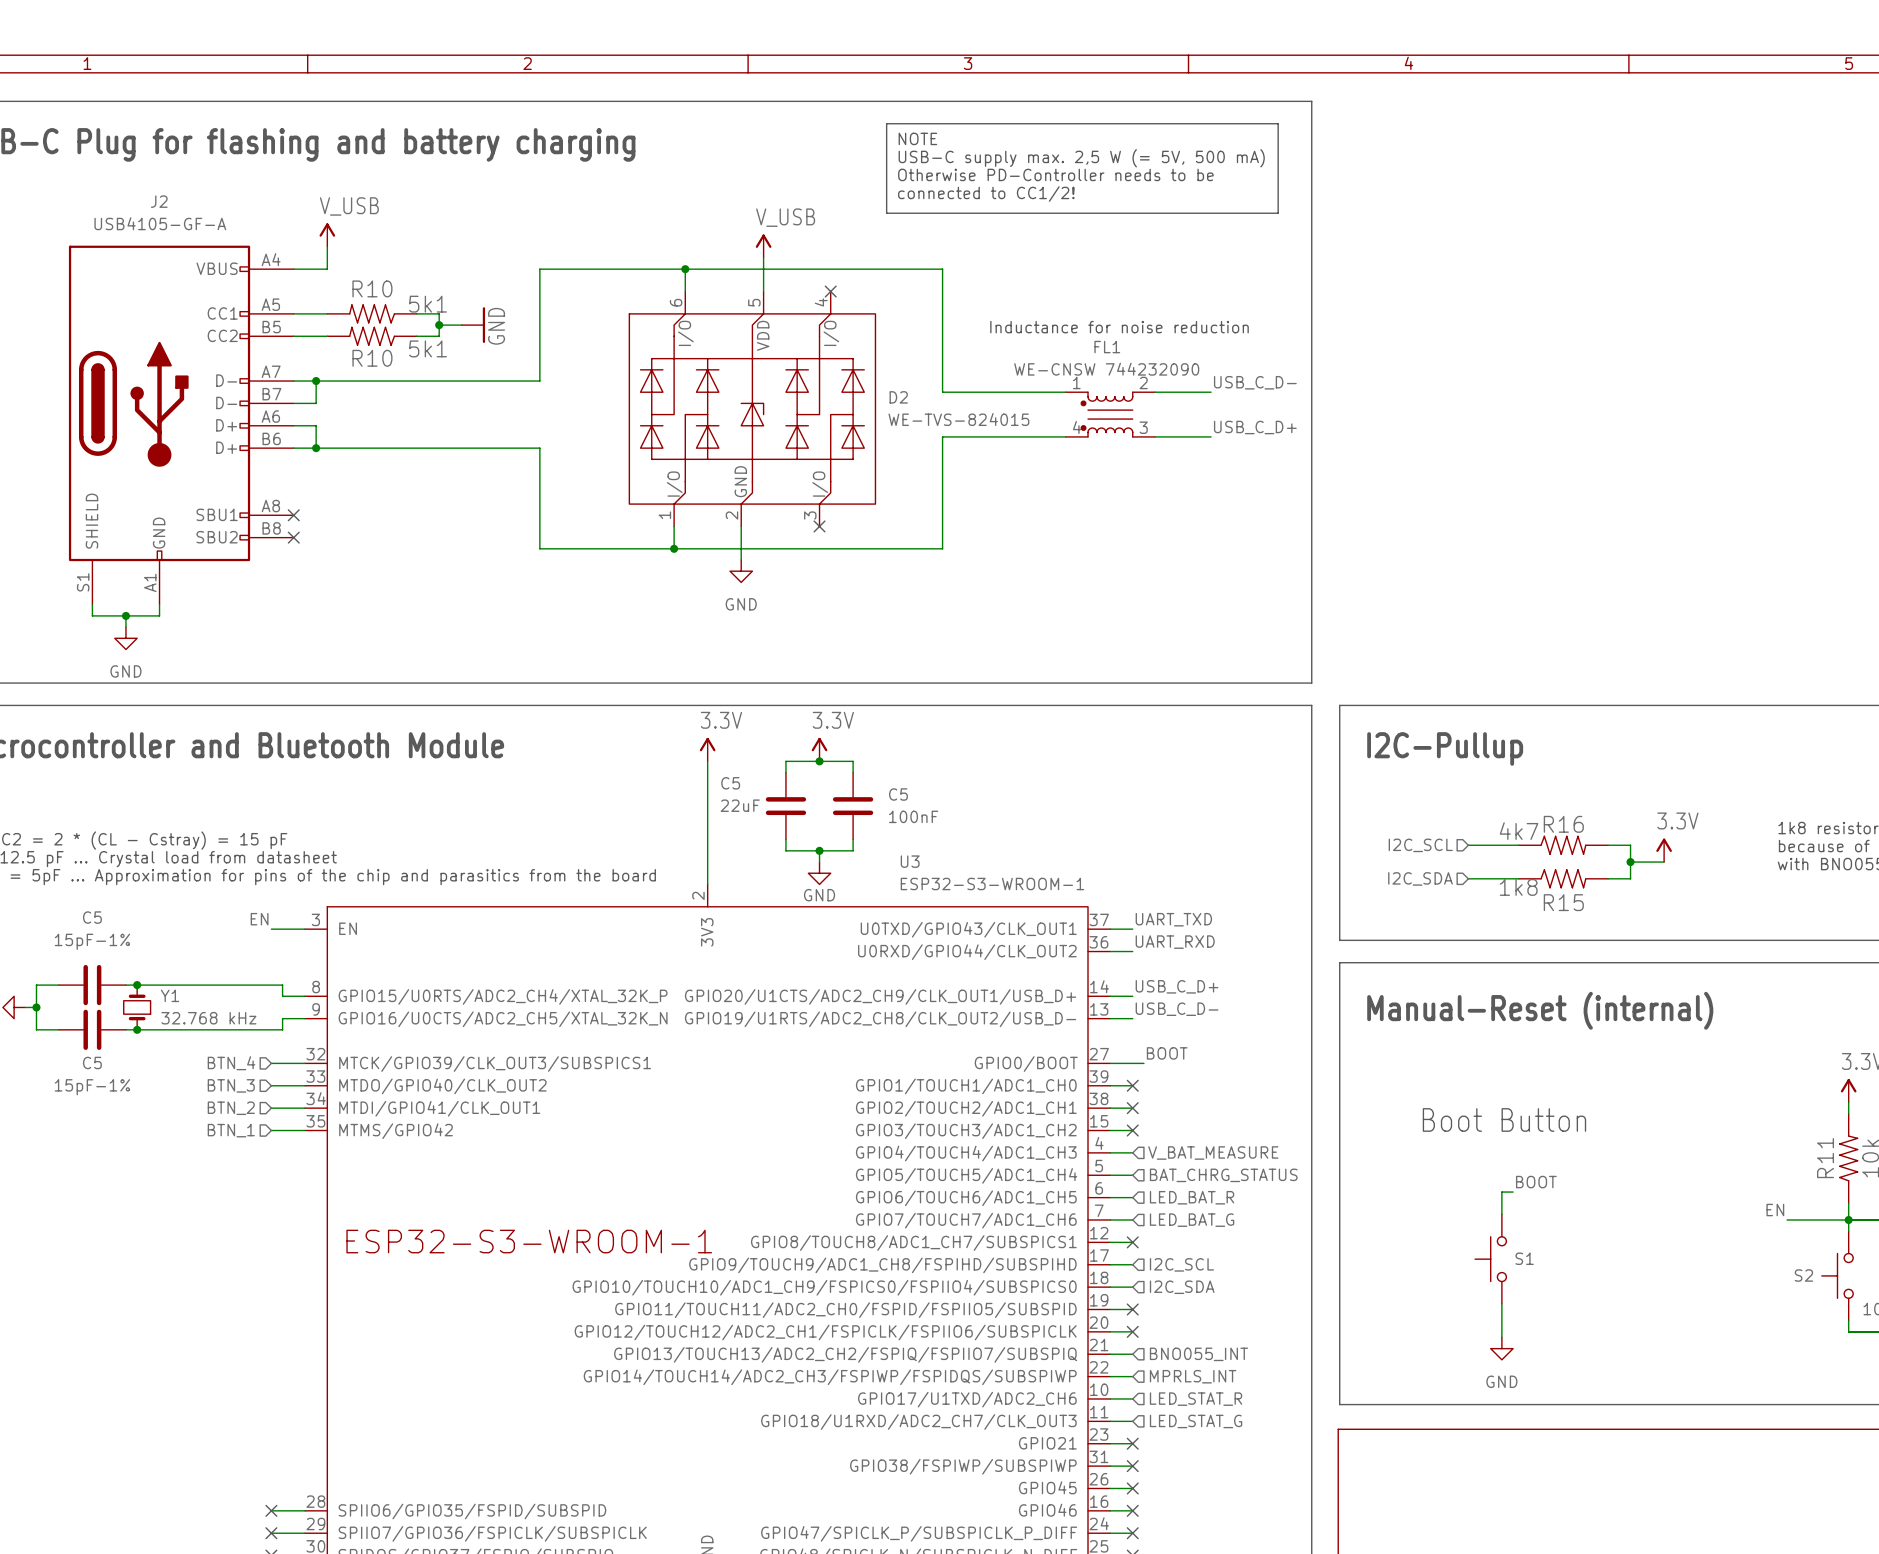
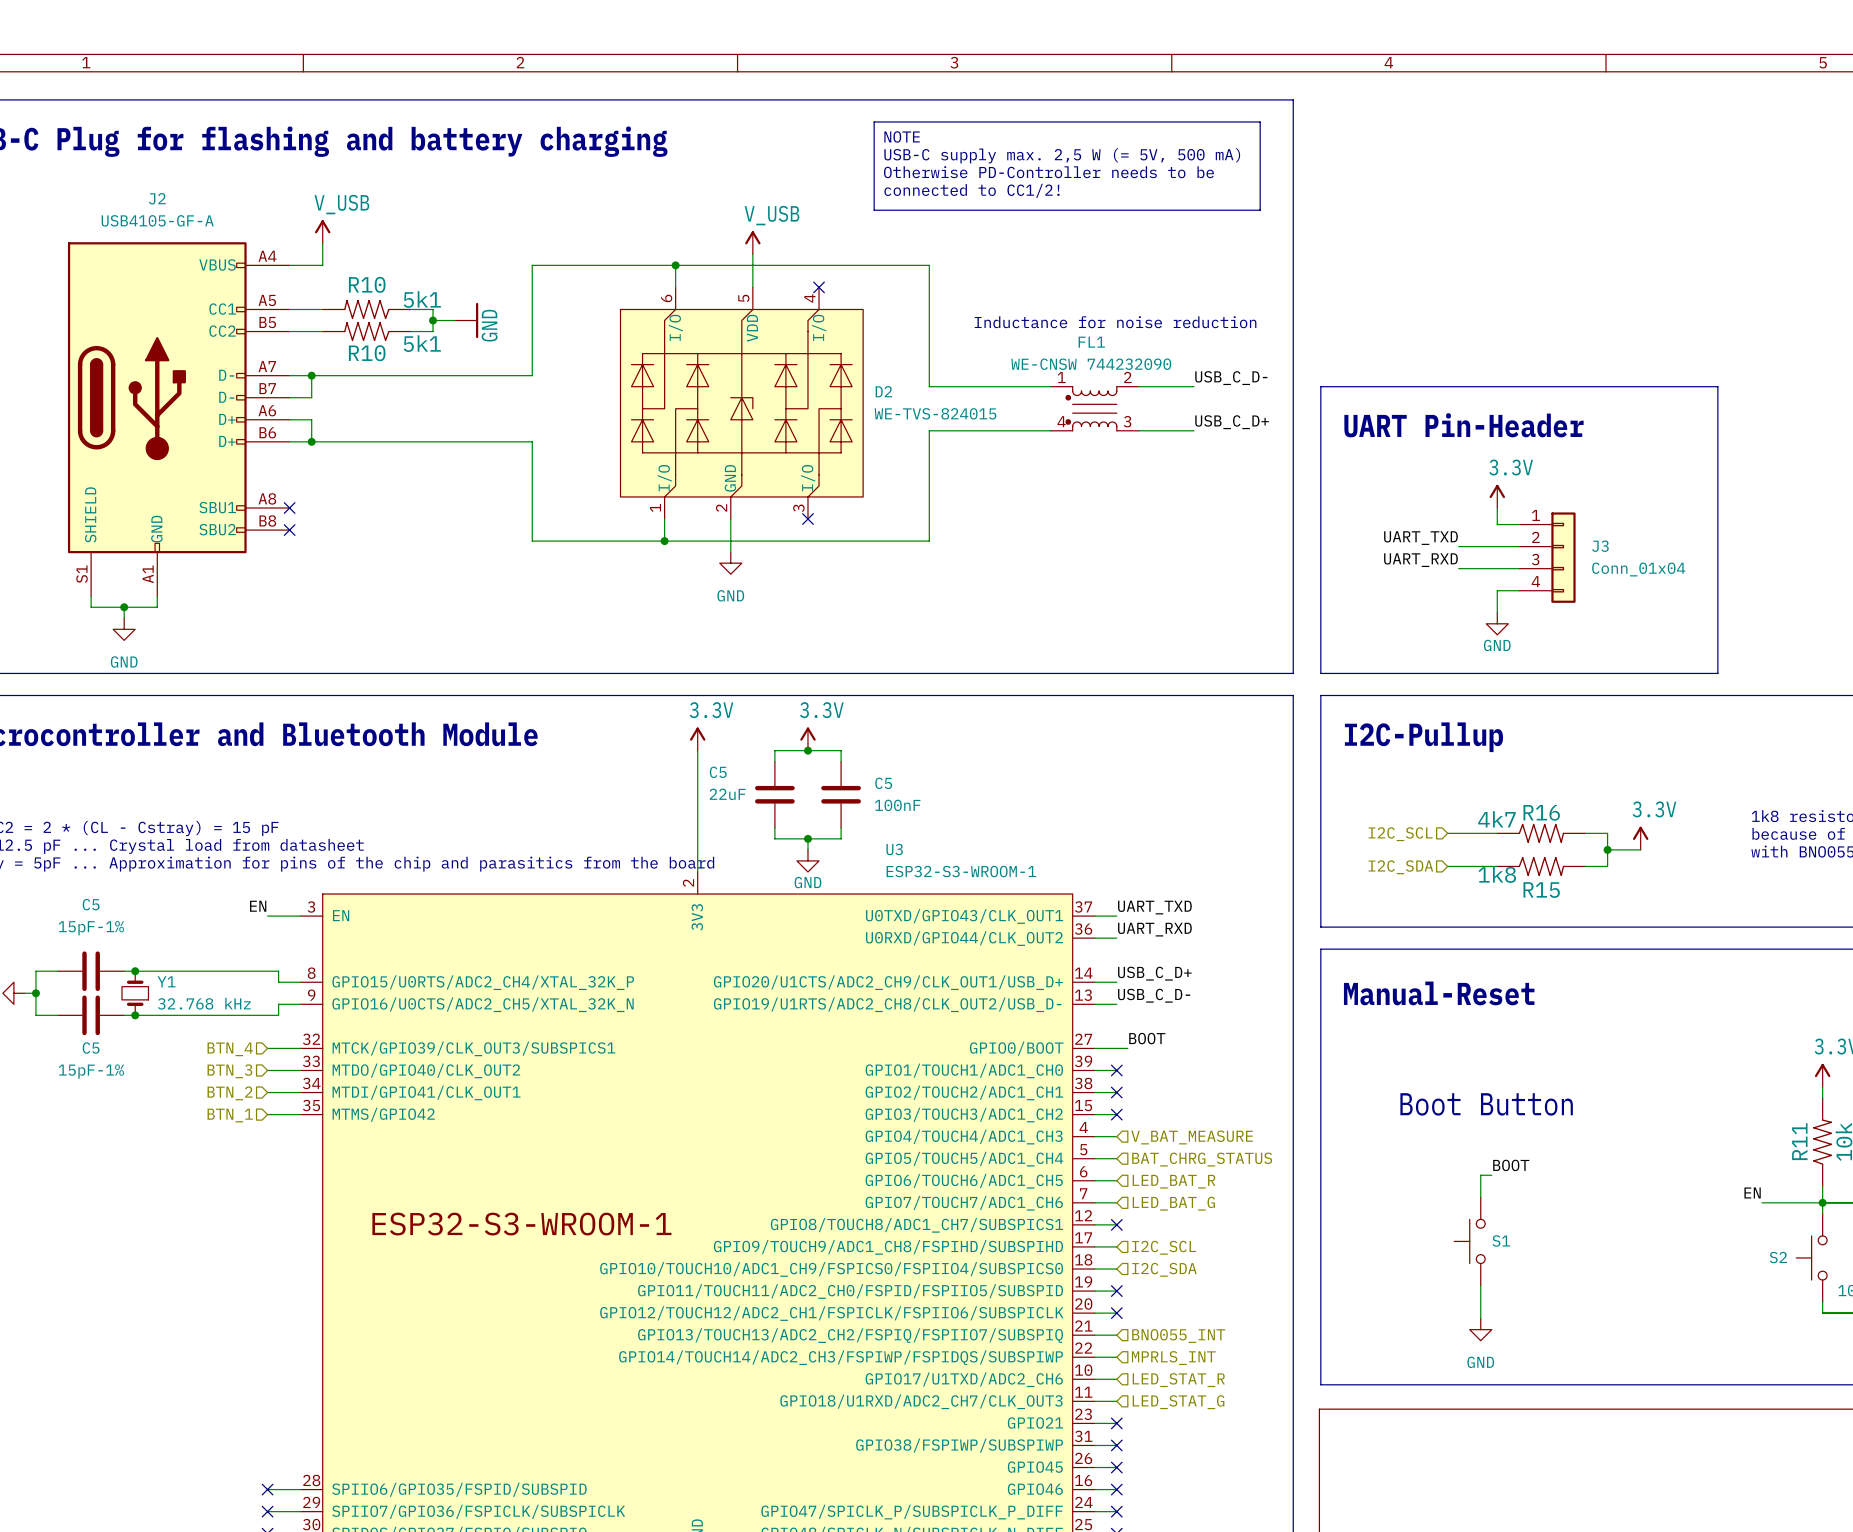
line: none -> (1320, 386) (1717, 386) (1717, 673) (1320, 673) (1320, 386)
text: none -> UART Pin-Header (1464, 425)
power symbol: none -> 3.3V (1497, 496)
wire: none -> (1497, 508) (1497, 524) (1519, 524)
label: none -> UART_TXD (1420, 538)
wire: none -> (1458, 546) (1519, 546)
J3: none -> Conn_01x04 (1547, 557)
label: none -> UART_RXD (1420, 560)
wire: none -> (1458, 568) (1519, 568)
wire: none -> (1519, 590) (1497, 590) (1497, 612)
power symbol: none -> GND (1497, 623)
text: Manual-Reset (internal) (1540, 1010) -> Manual-Reset (1439, 993)

